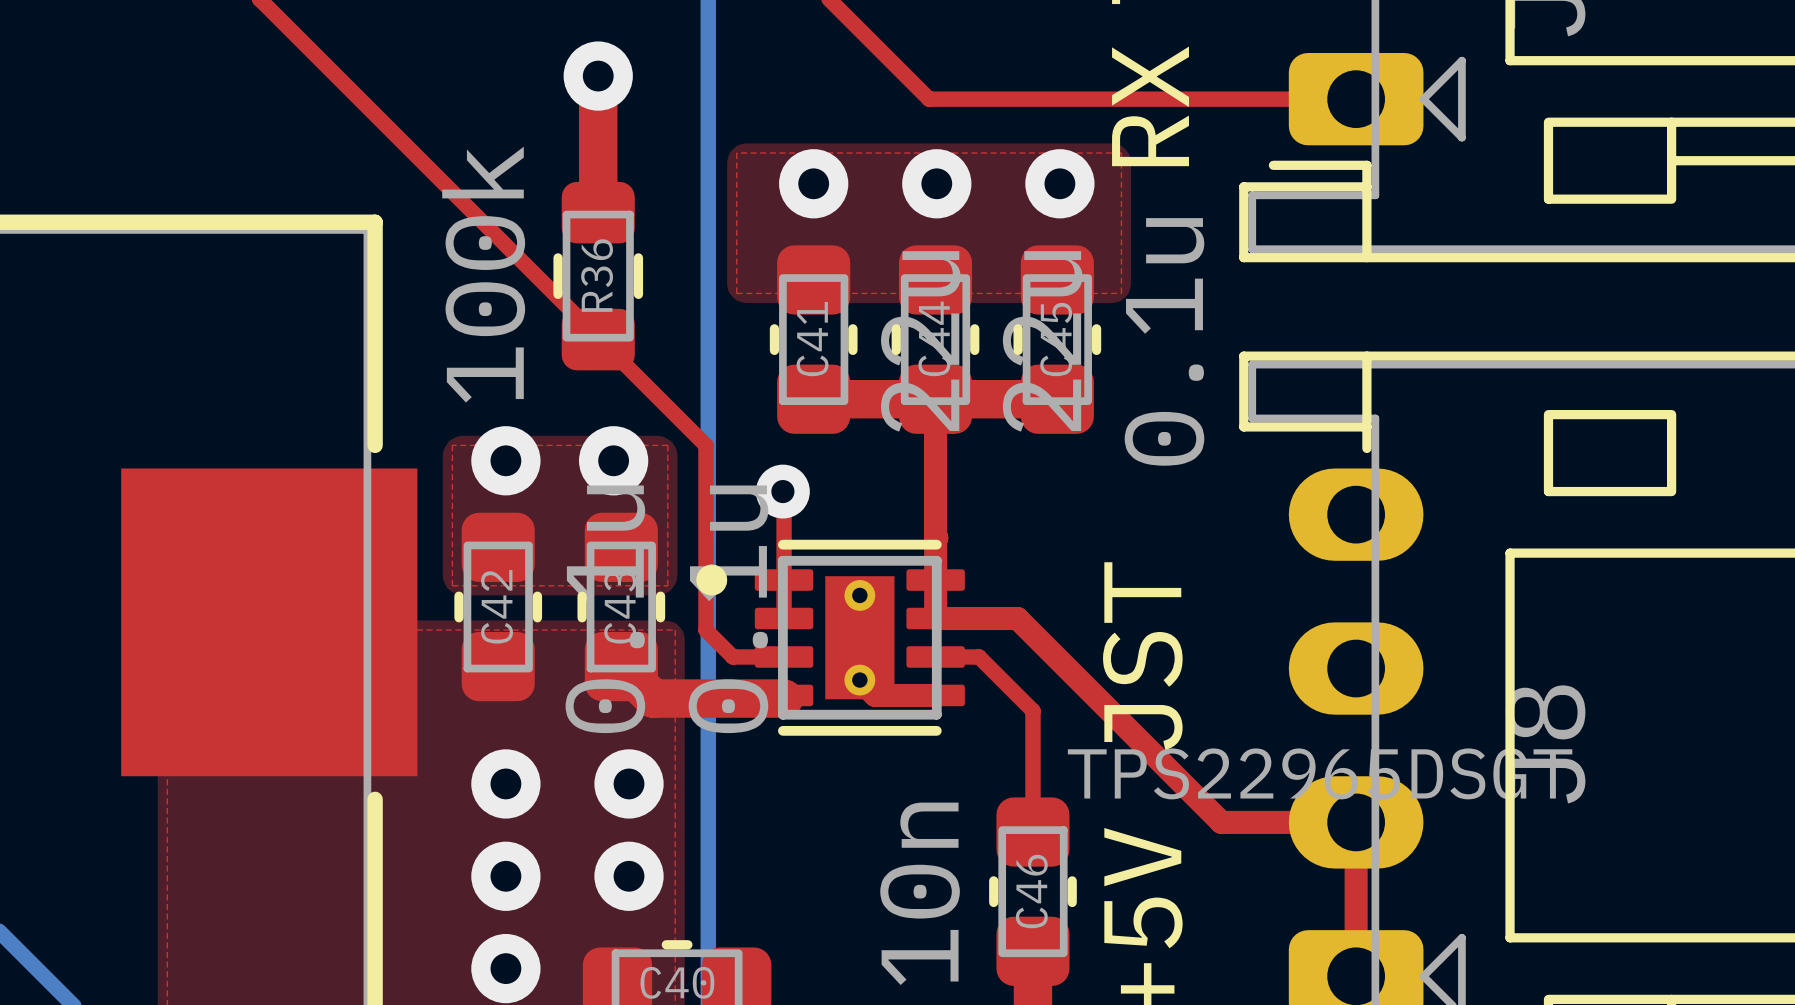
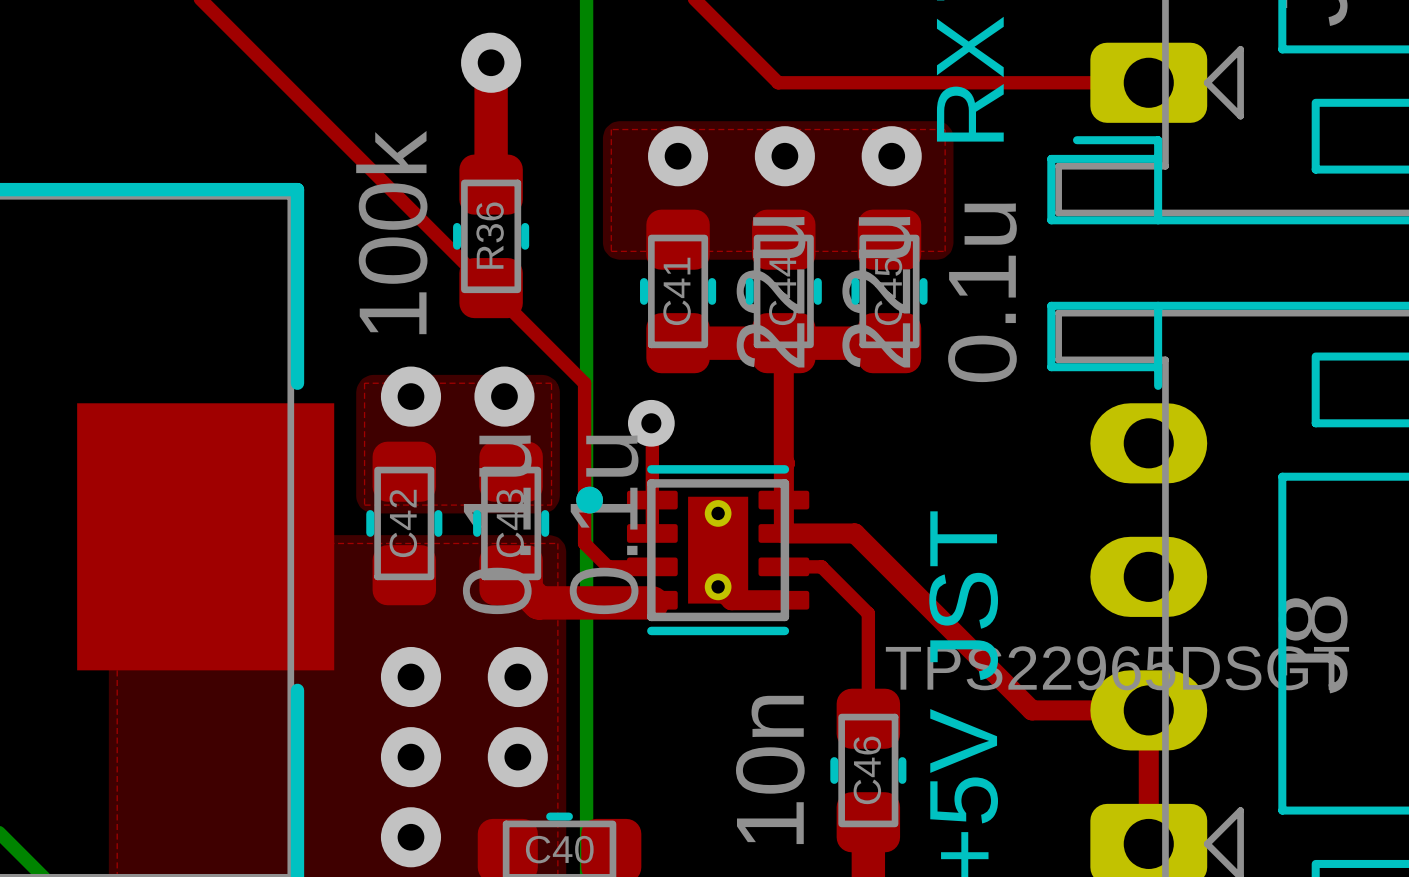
R36 footprint: [553, 181, 644, 371] -> [453, 154, 530, 319]

